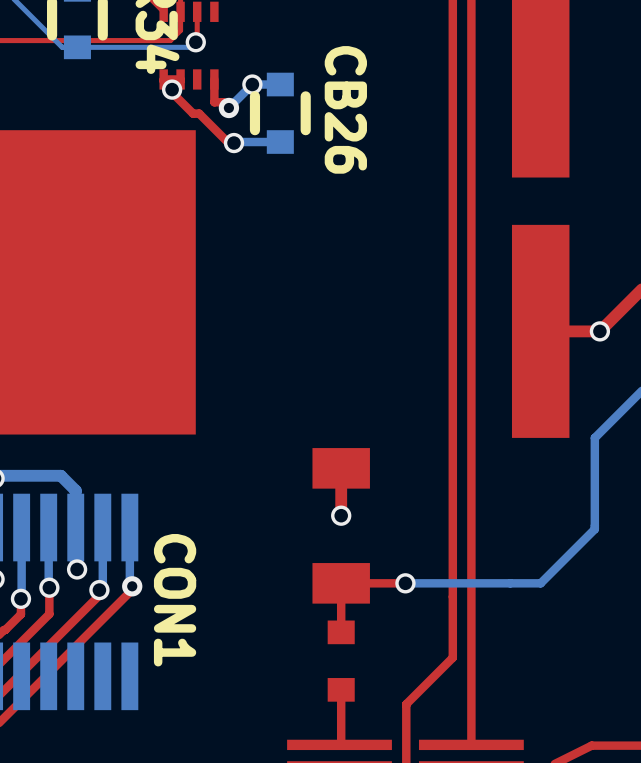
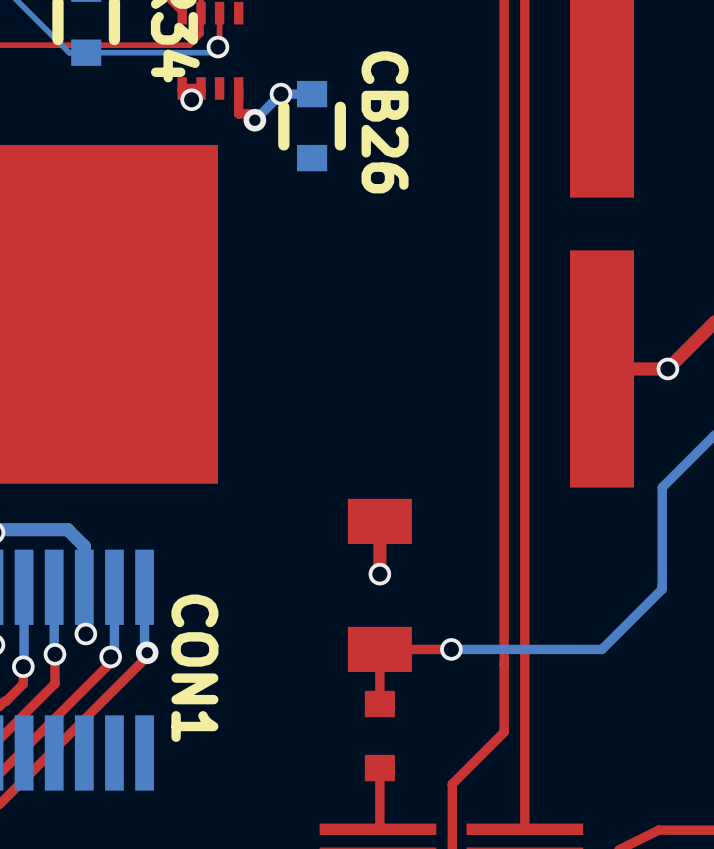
top track: (172, 89) (172, 92) (193, 113) (199, 113) (228, 143) (234, 143) -> none
bottom track: (280, 142) (234, 143) -> none
via: (234, 143) -> none

